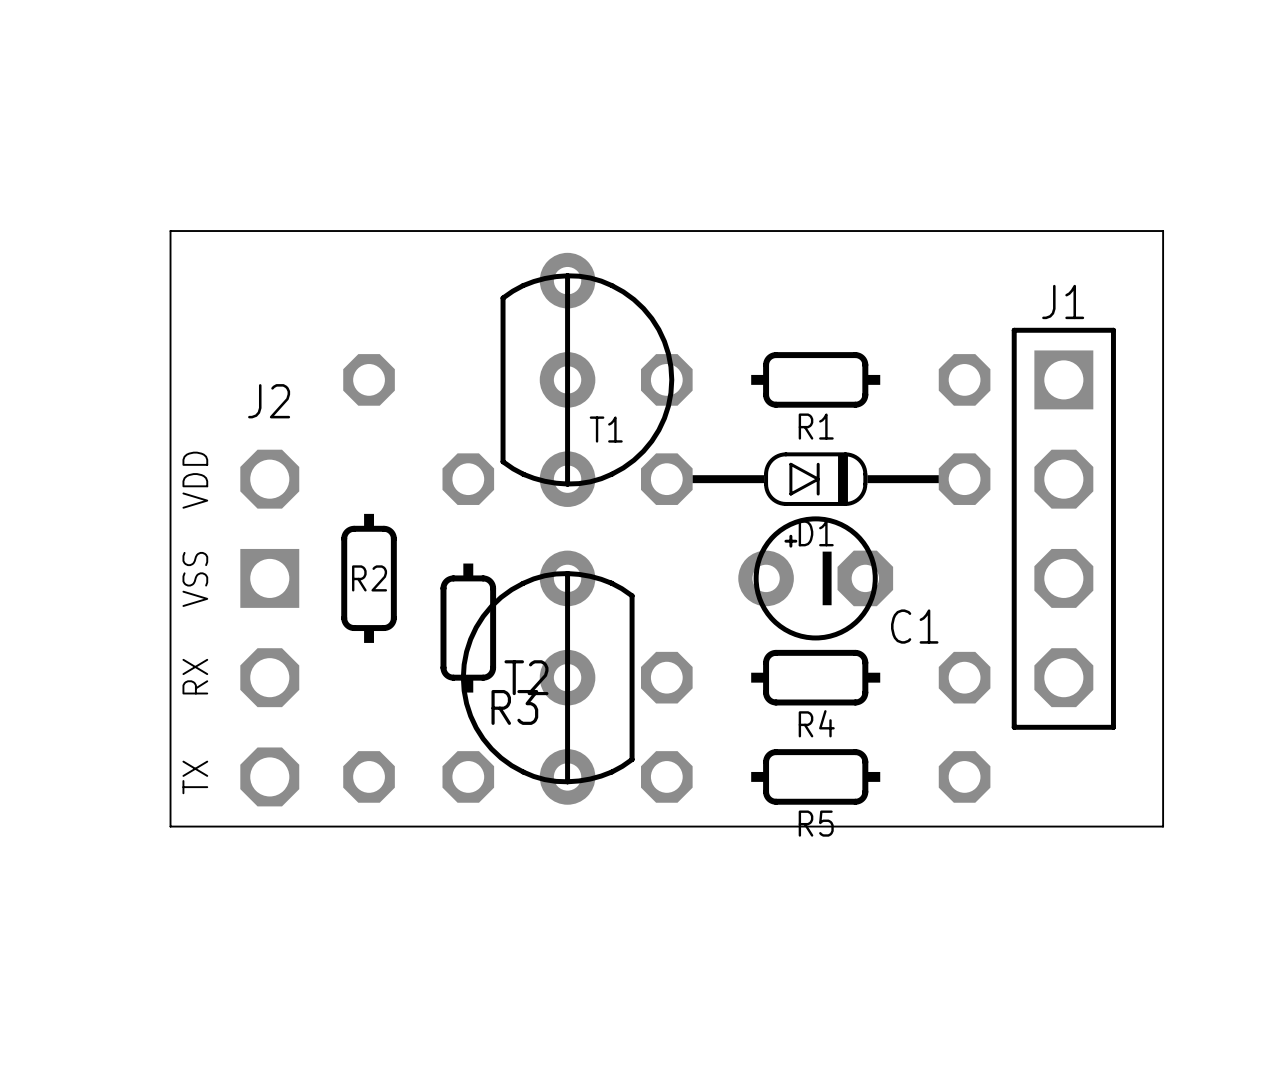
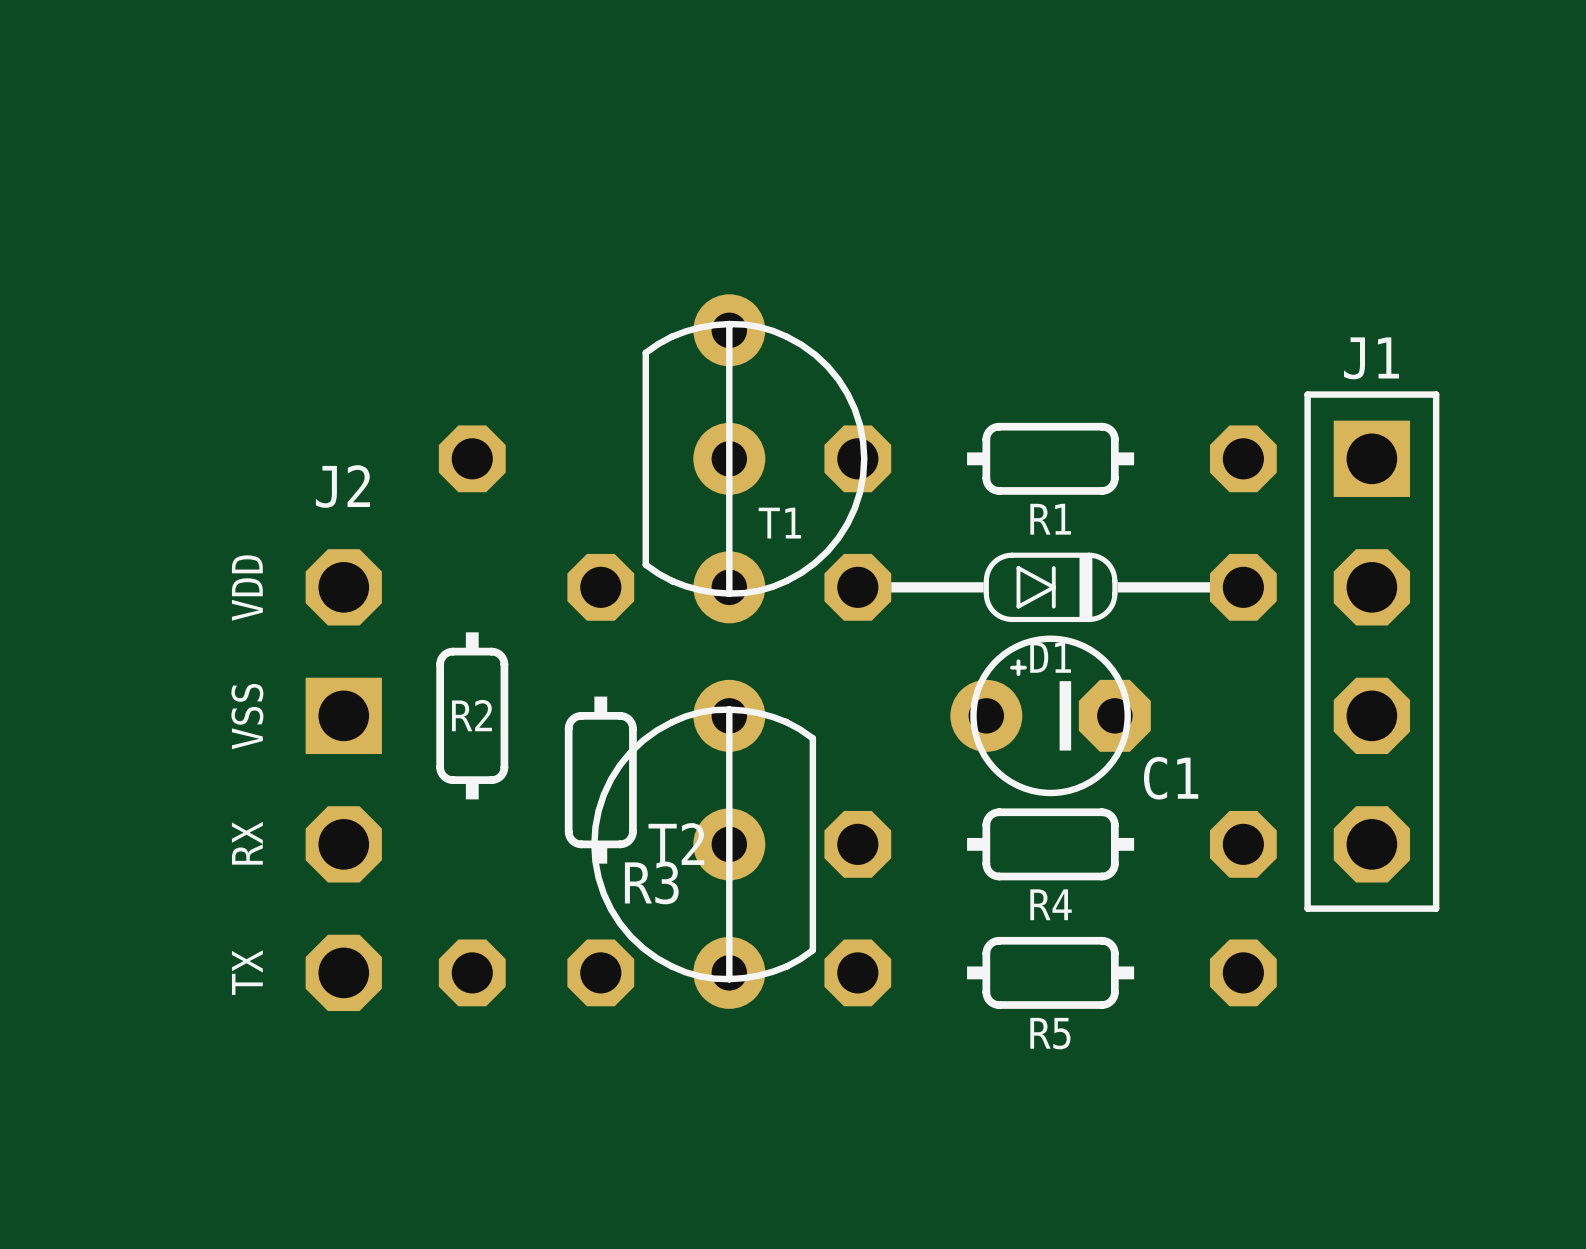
board edge: (170, 231) (1163, 231) (1163, 826) (170, 826) (170, 231) -> none

